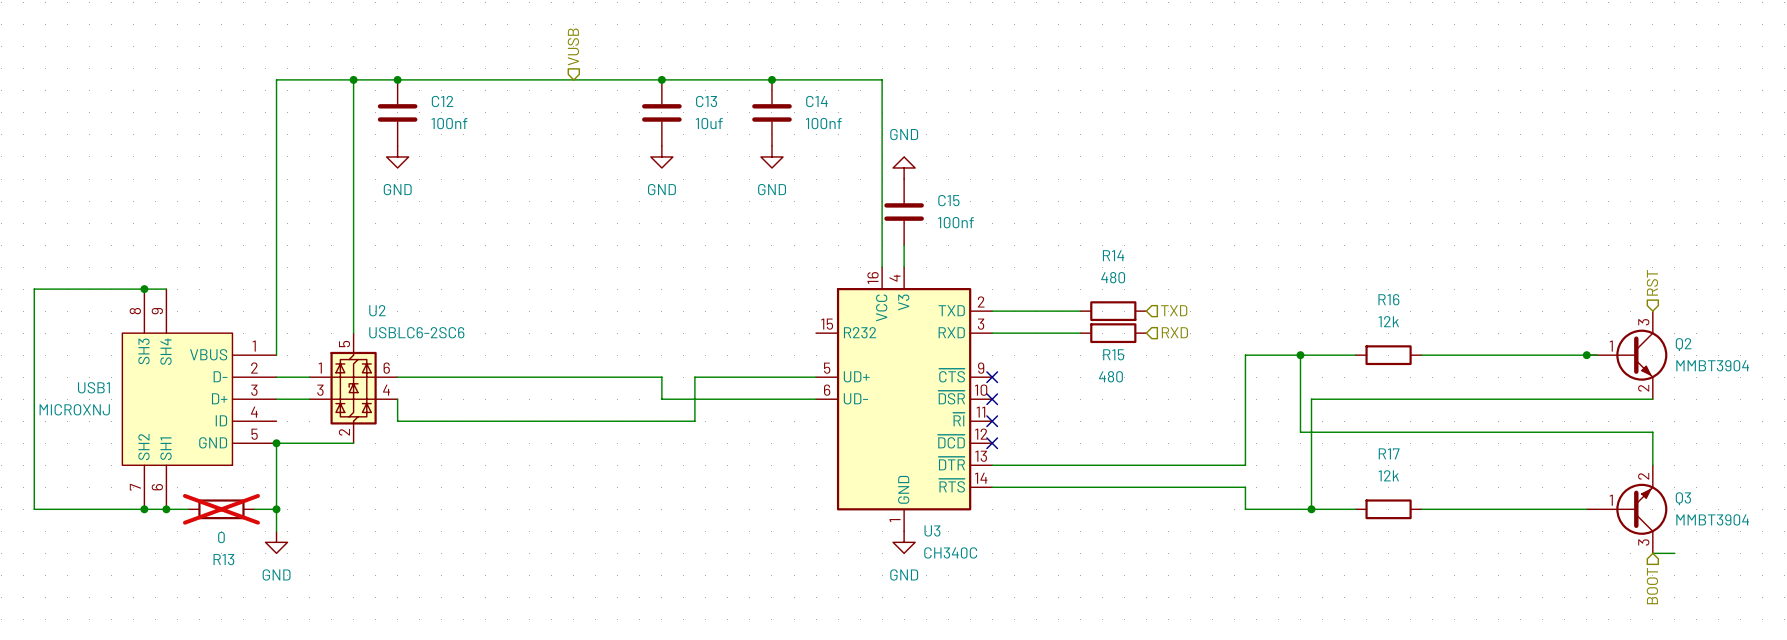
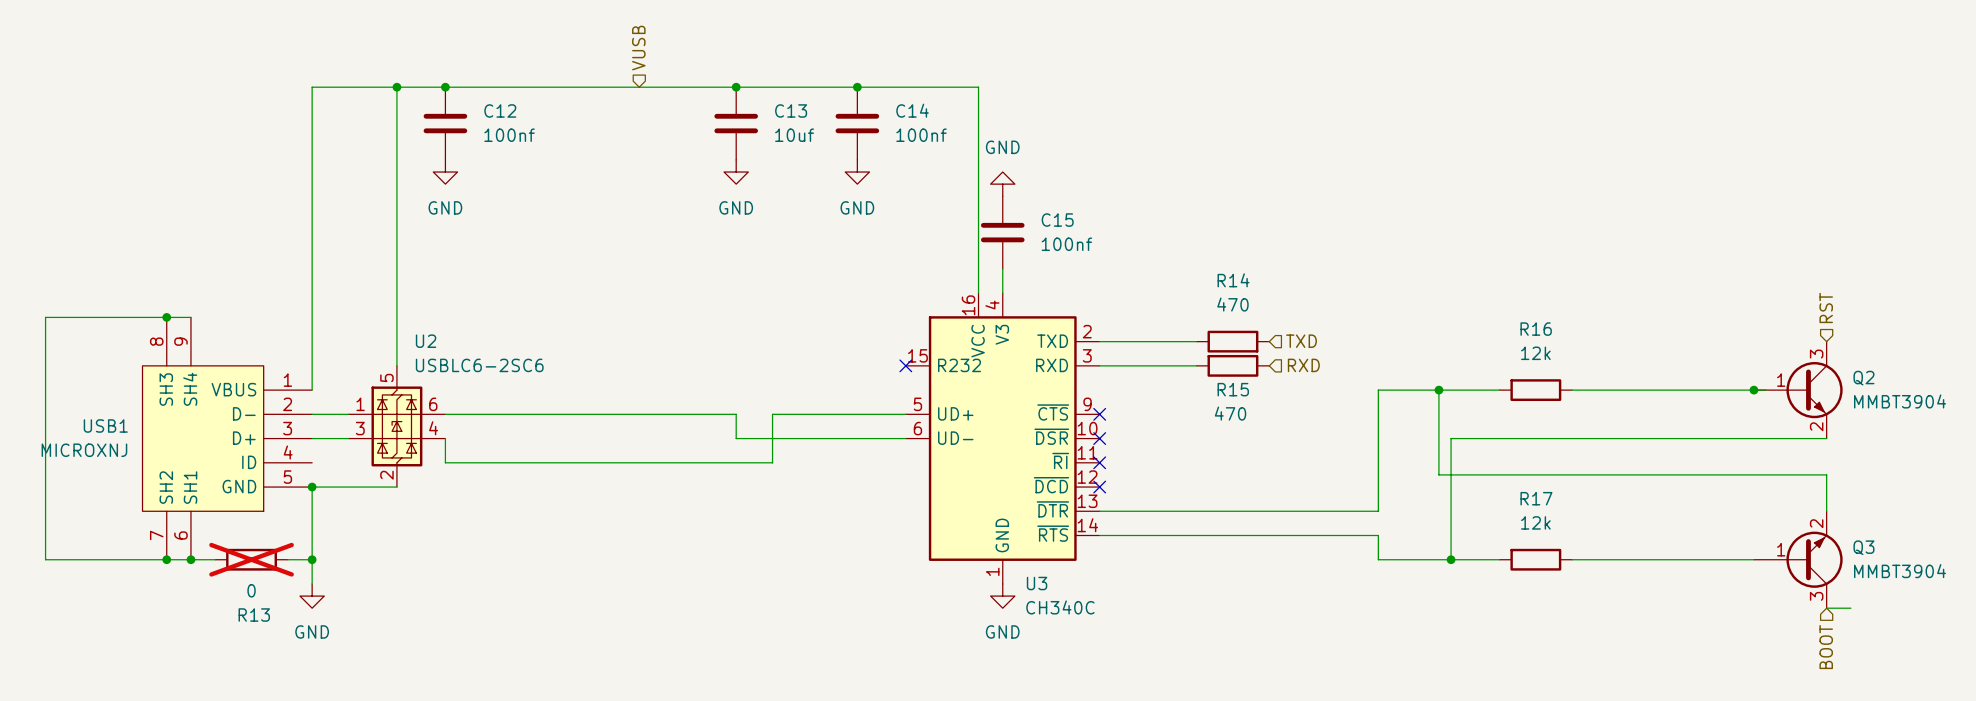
R14 value: 480 (1113, 277) -> 470 (1232, 304)
no-connect mark: none -> (905, 365)
R15 value: 480 (1110, 376) -> 470 (1230, 413)

